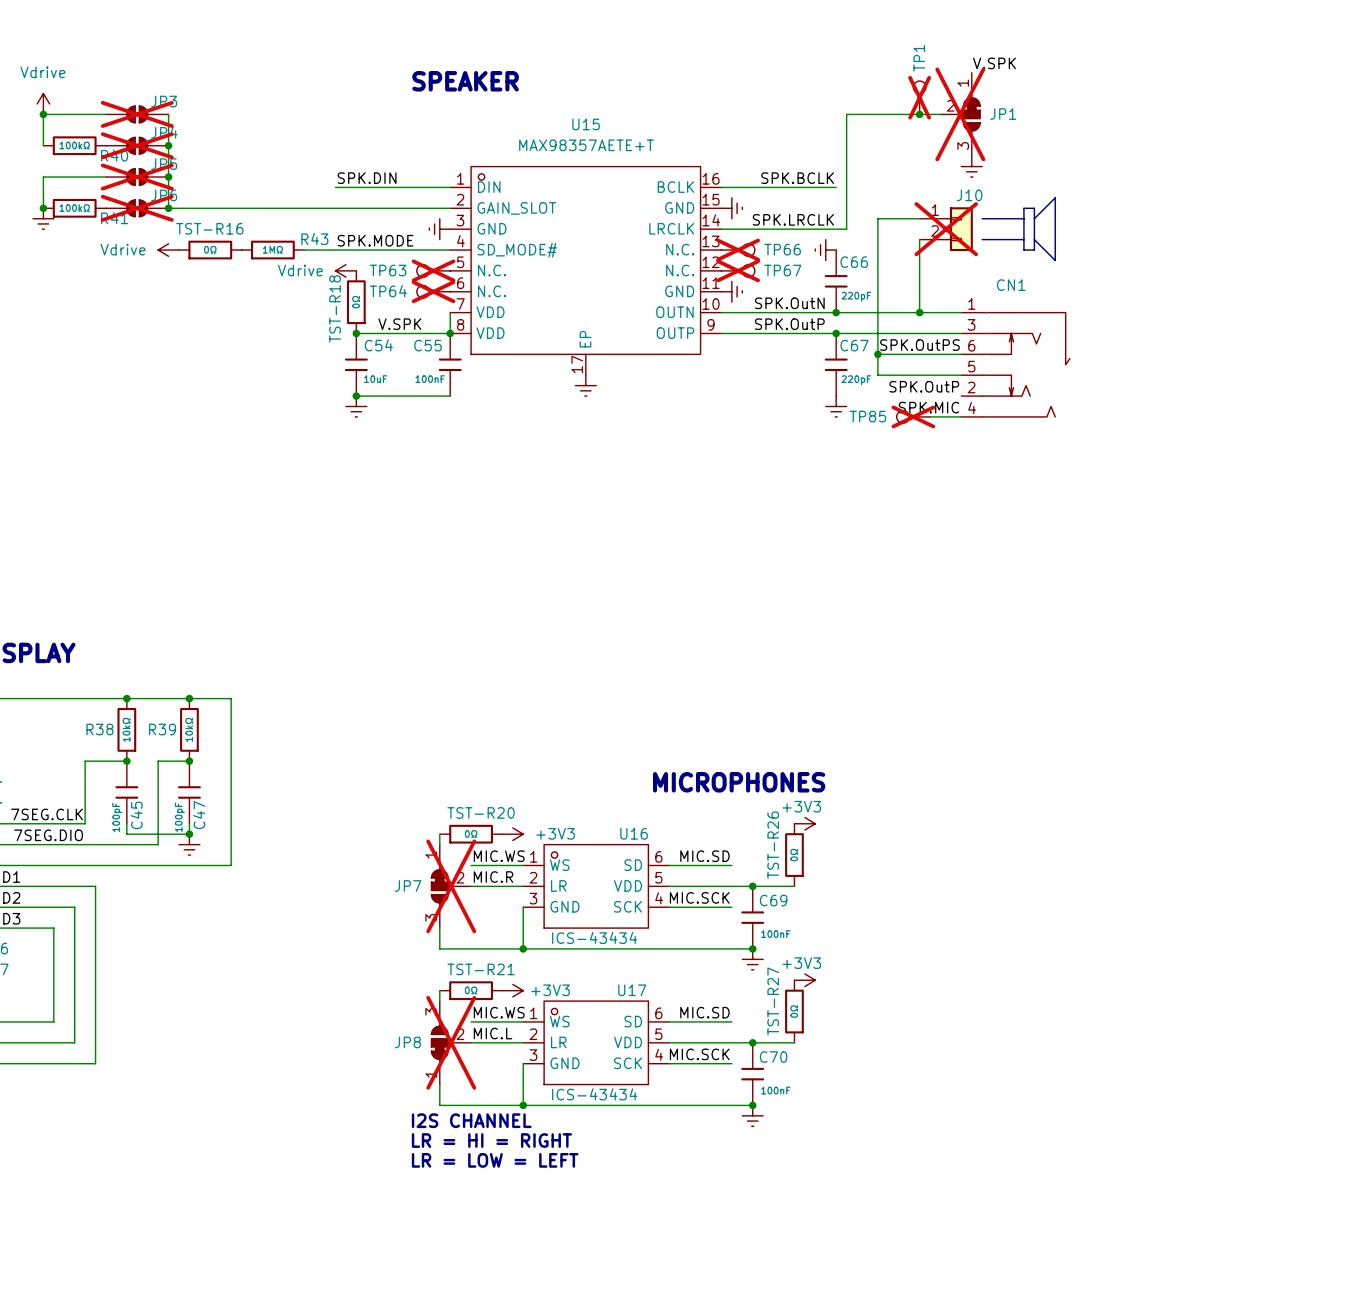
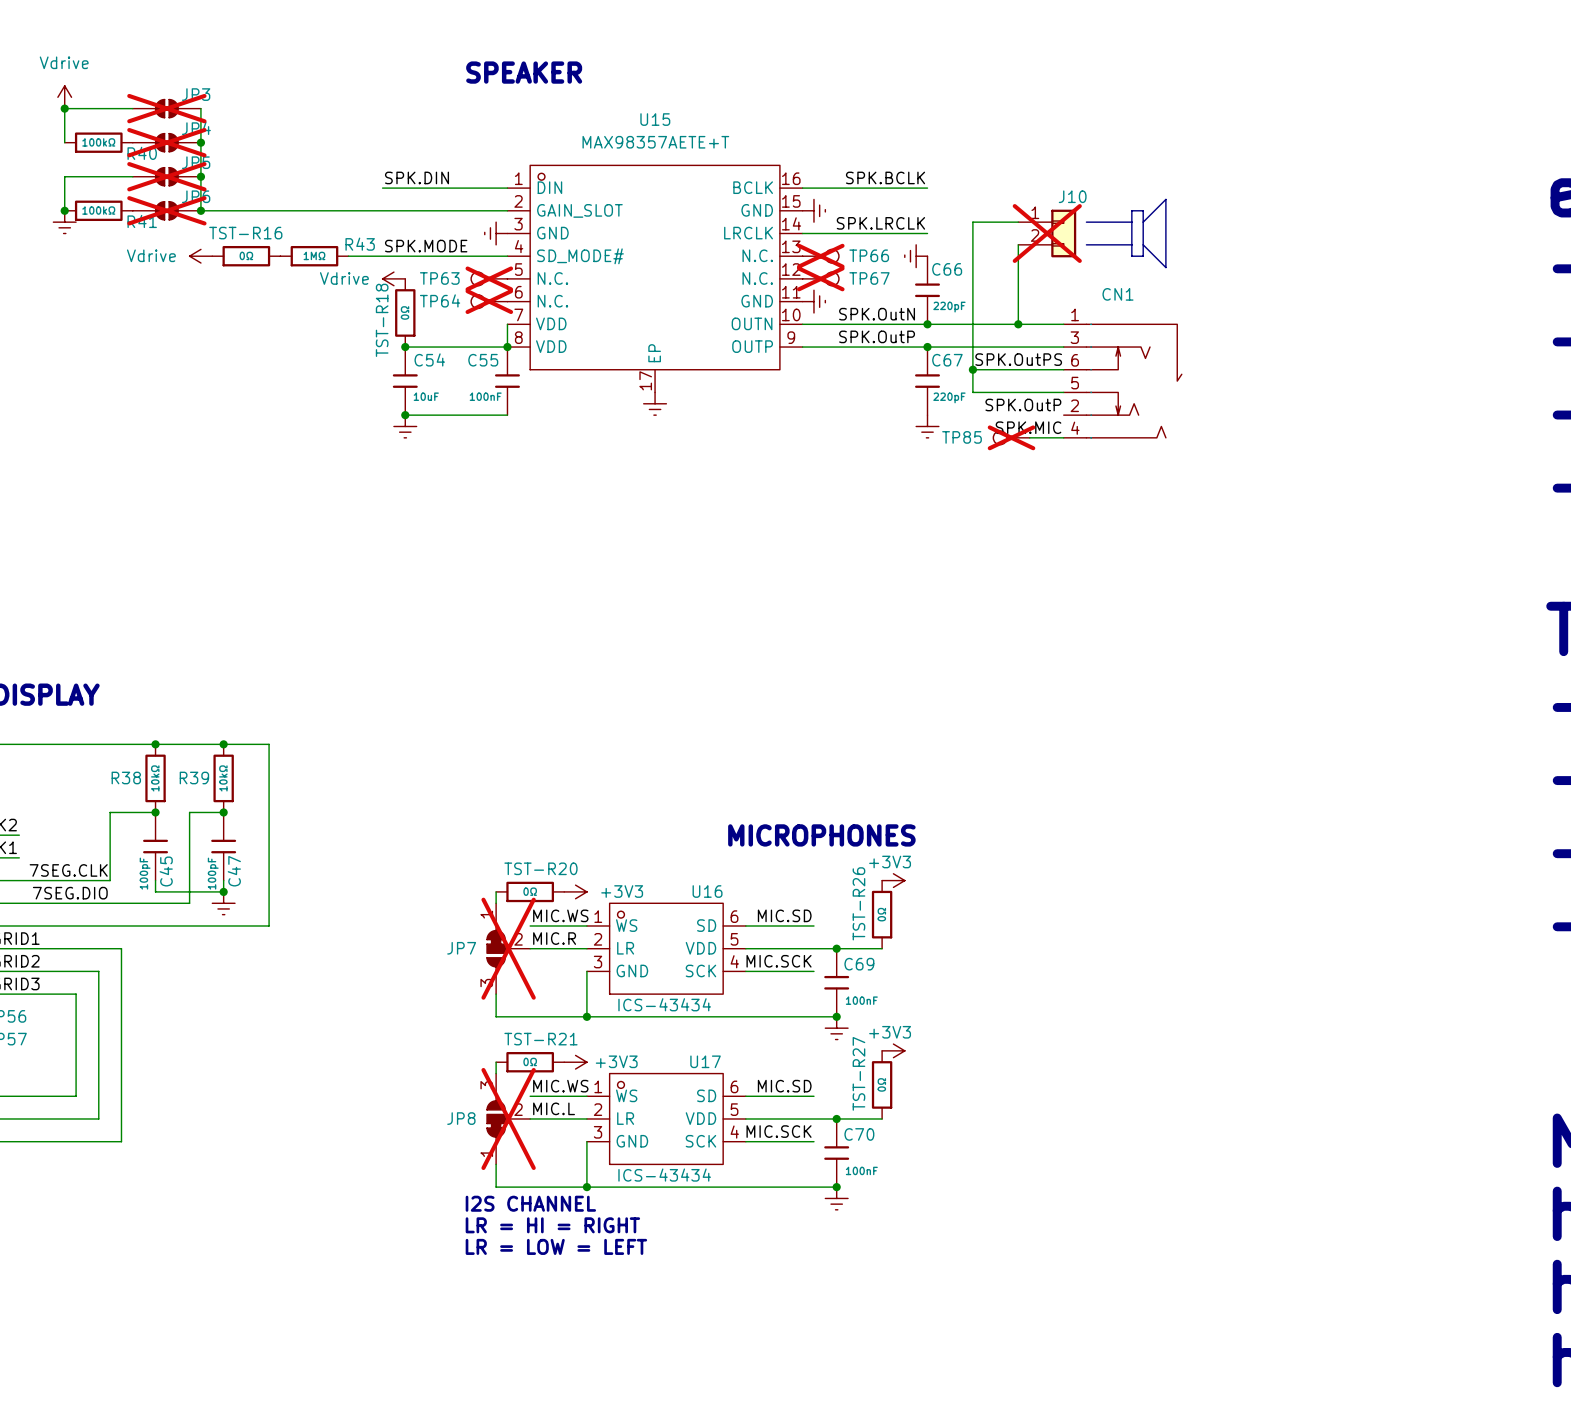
label: V.SPK (994, 63) -> none
TP1: (919, 97) -> none
junction: (919, 114) -> none
wire: (940, 114) (846, 114) (846, 229) (836, 229) -> none
JP1: (960, 114) -> none
power symbol: (971, 166) -> none
label: V.SPK (399, 324) -> none

